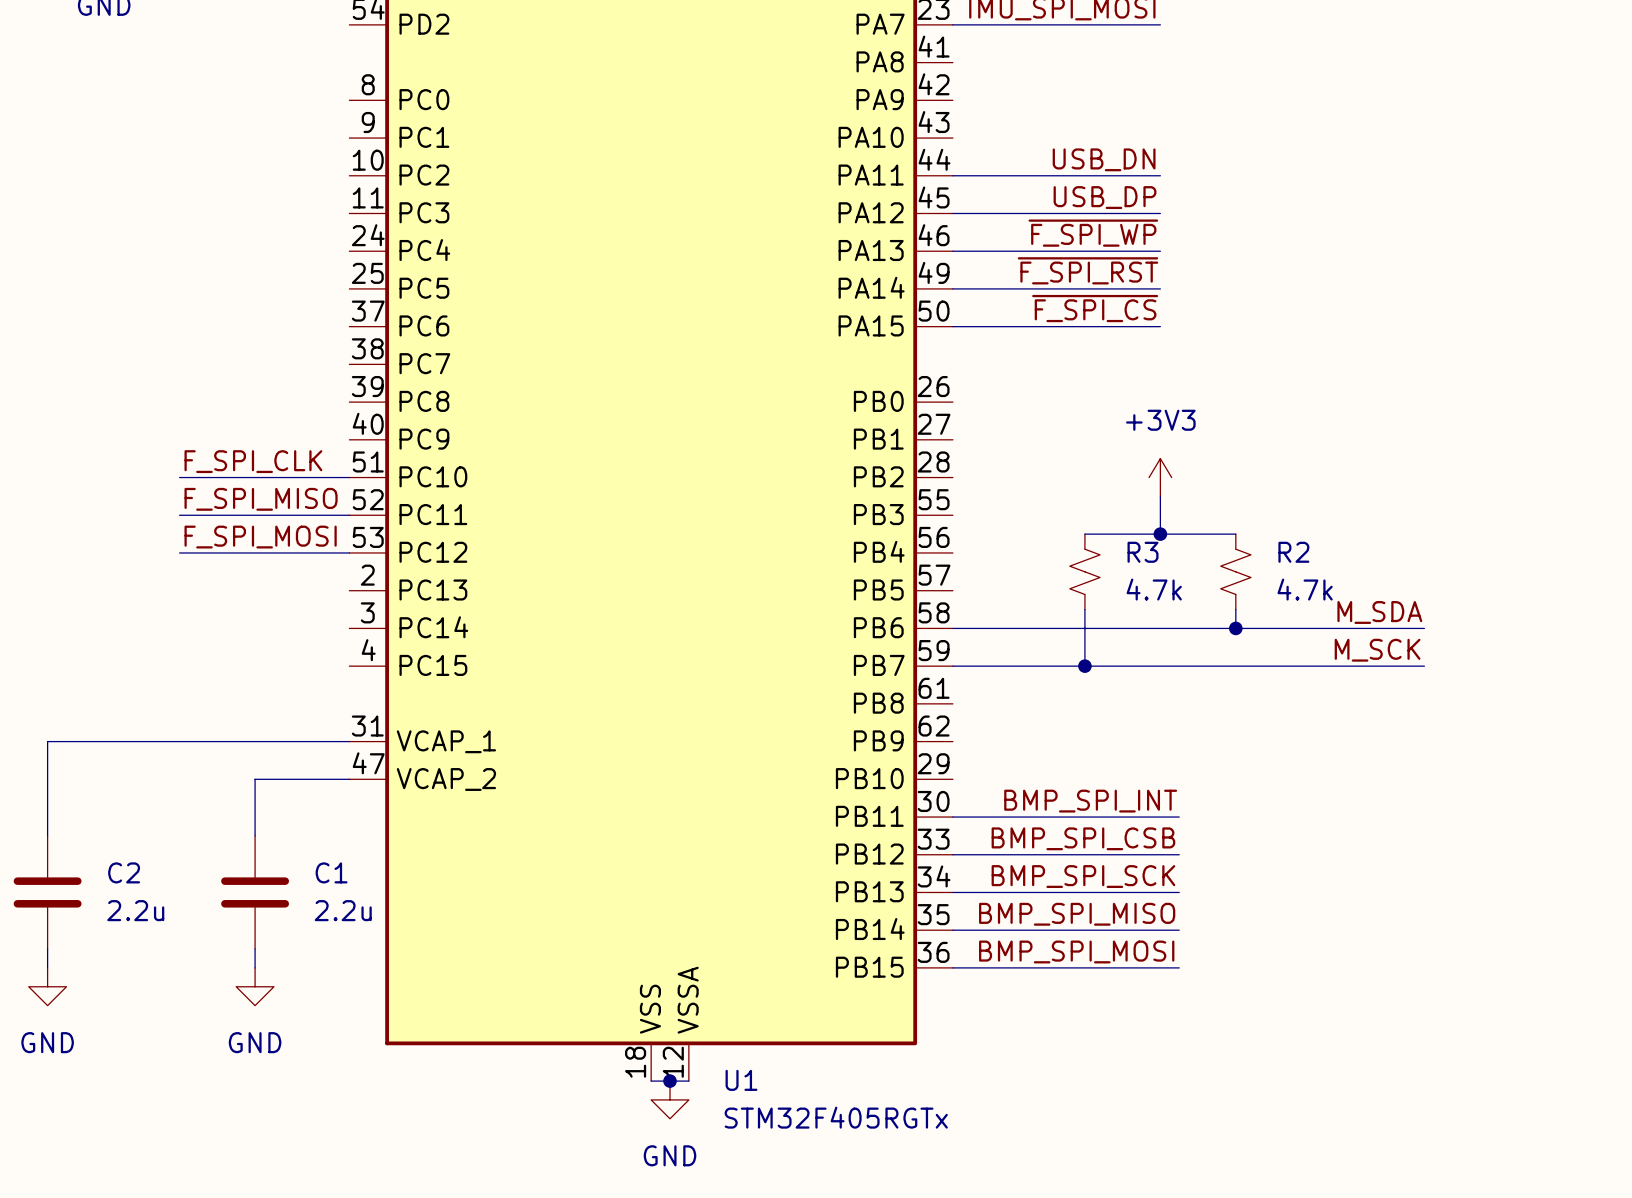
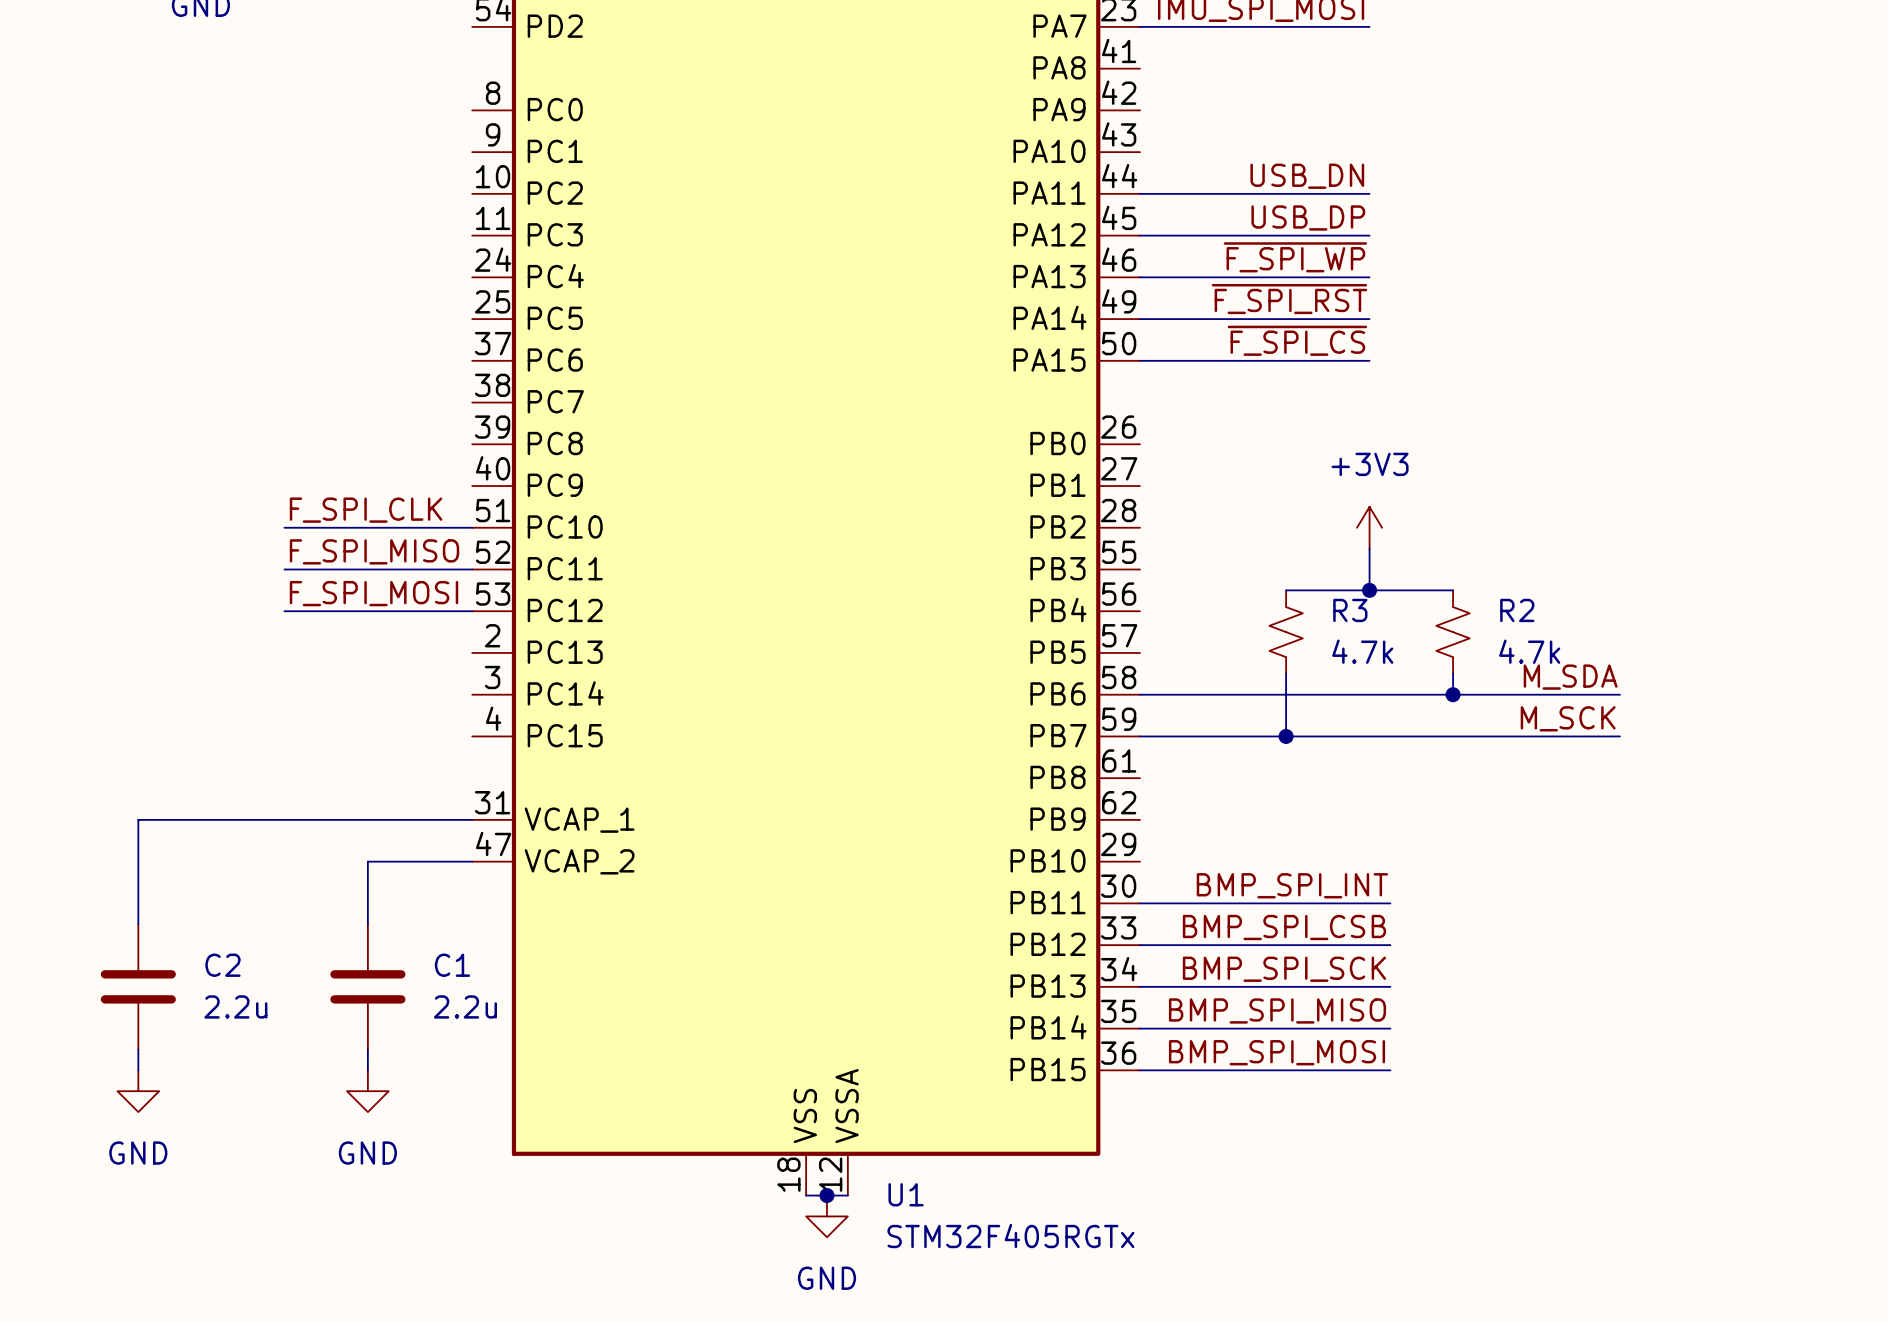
label position: M_SDA (1379, 612) -> M_SDA (1570, 677)
wire: (1386, 628) (1424, 628) -> none
label position: M_SCK (1377, 650) -> M_SCK (1568, 718)
wire: (1386, 666) (1424, 666) -> none

